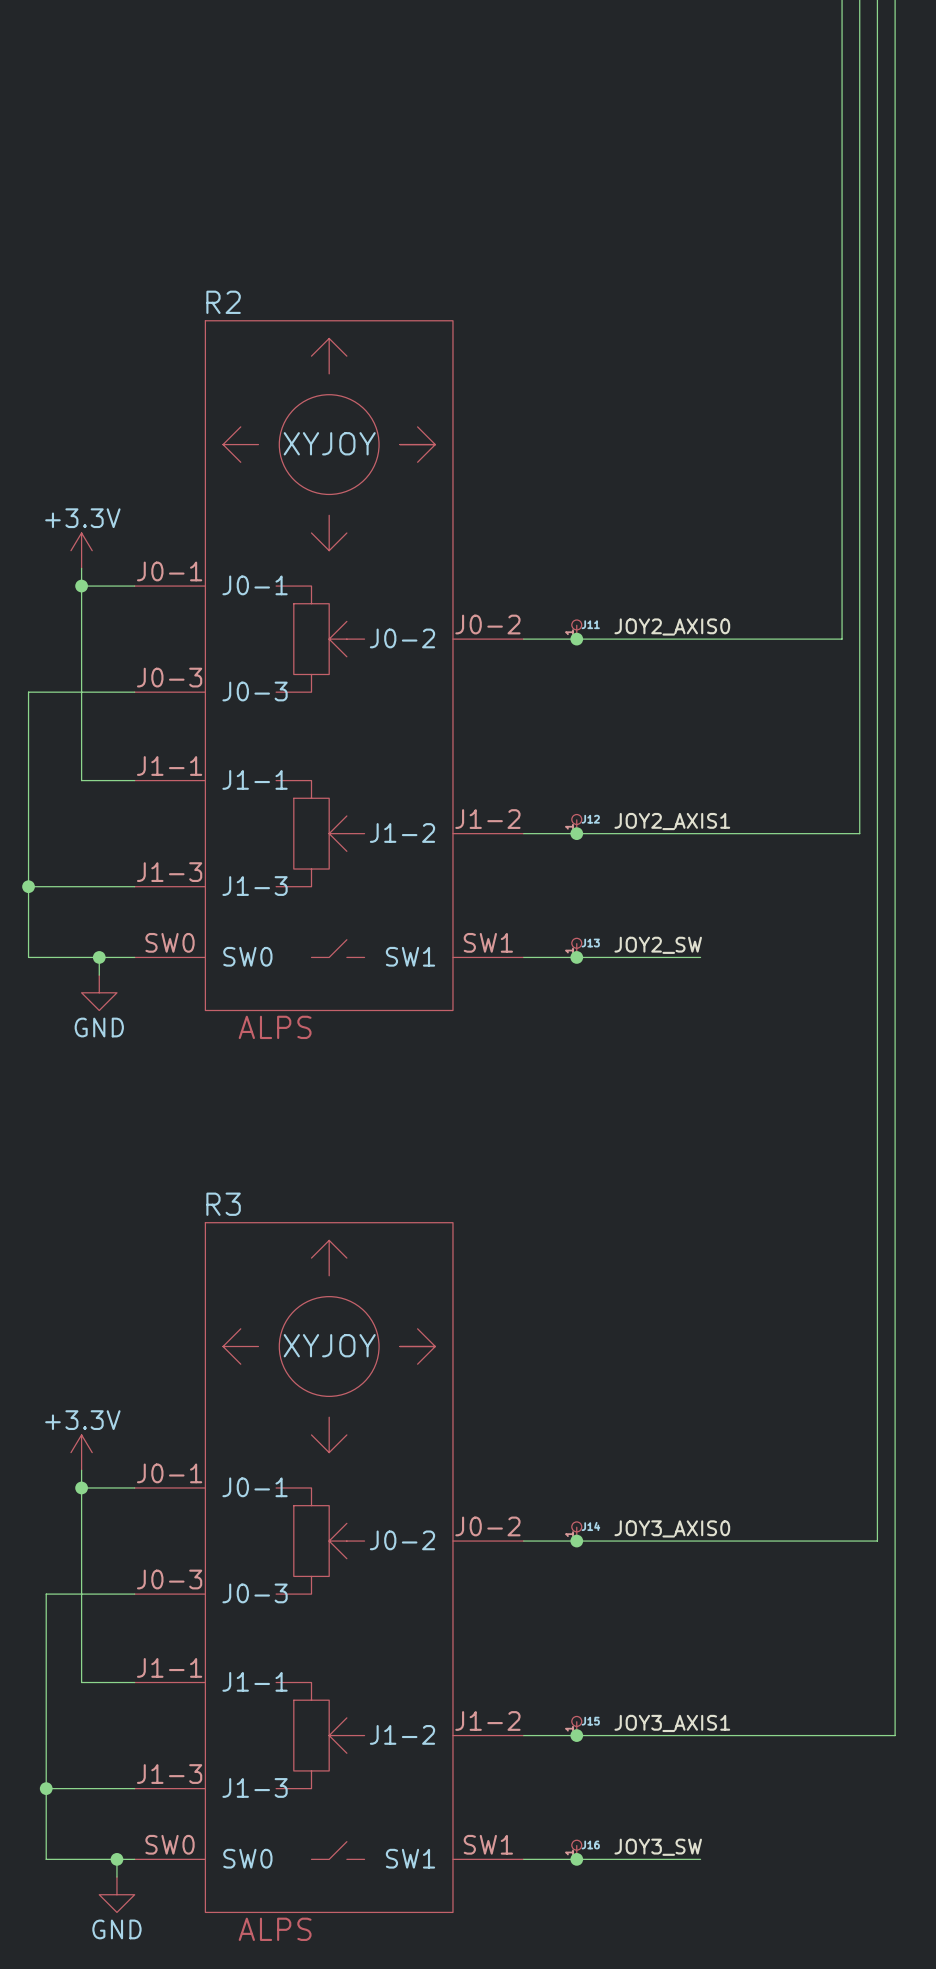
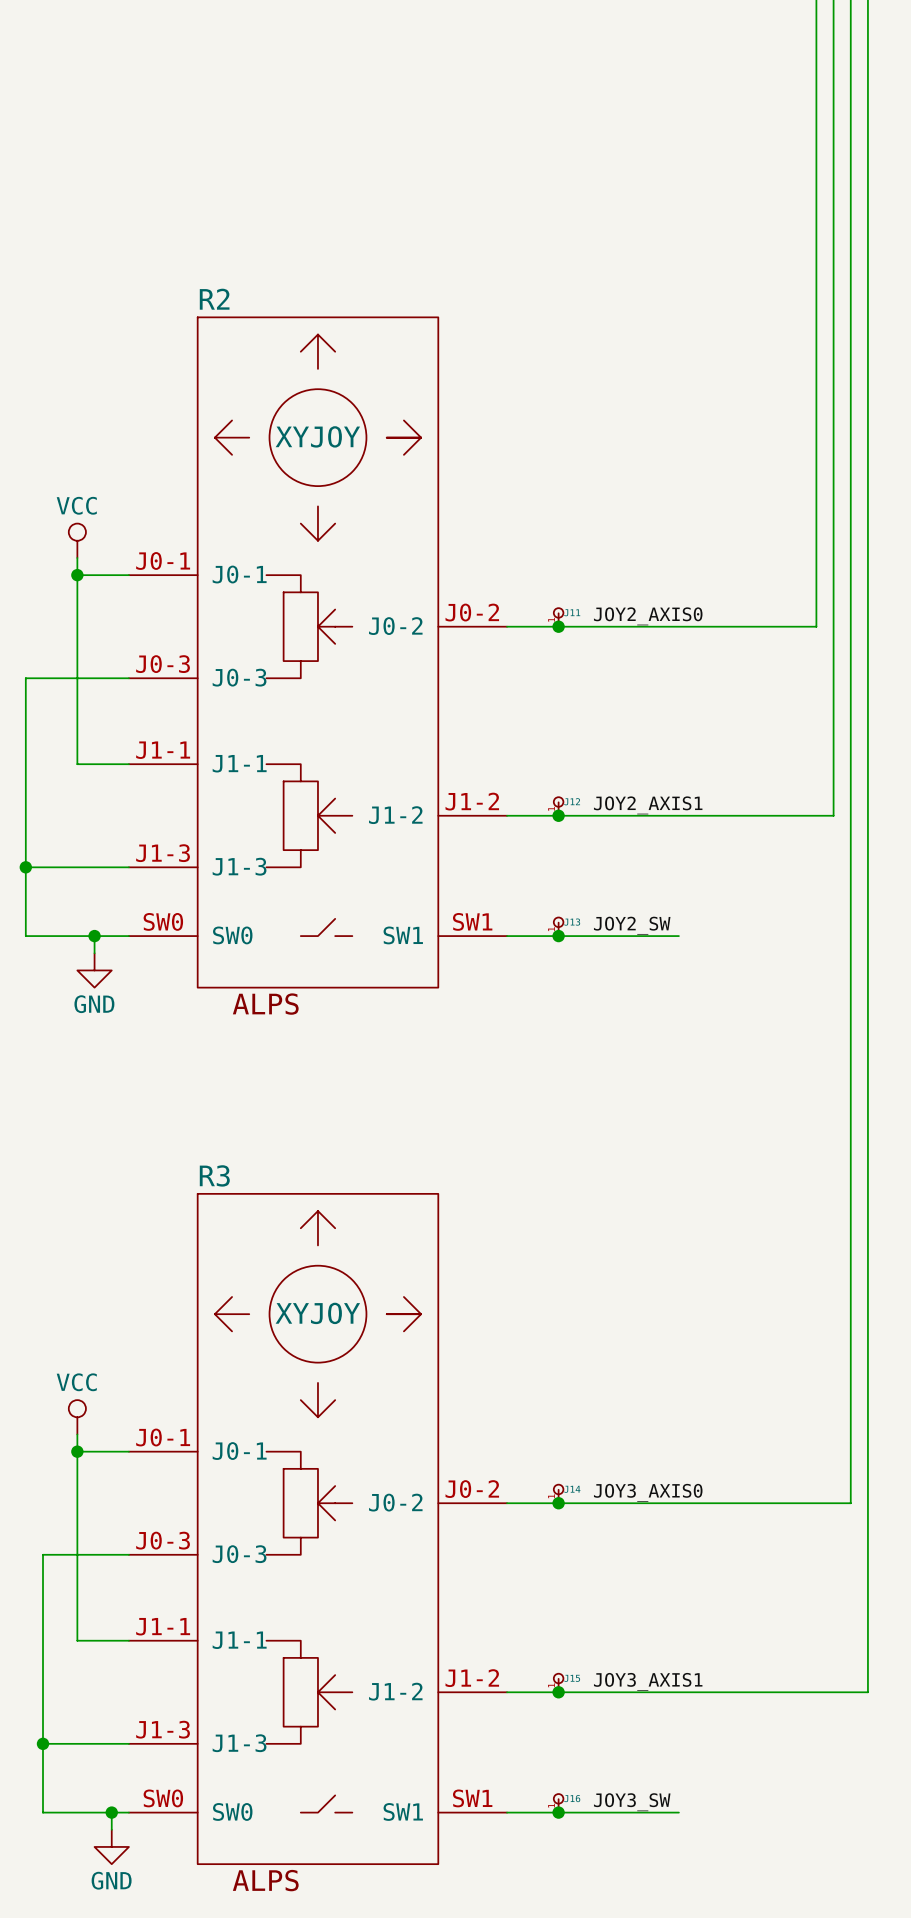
power symbol: +3.3V (81, 550) -> VCC (77, 540)
power symbol: +3.3V (81, 1452) -> VCC (77, 1417)

